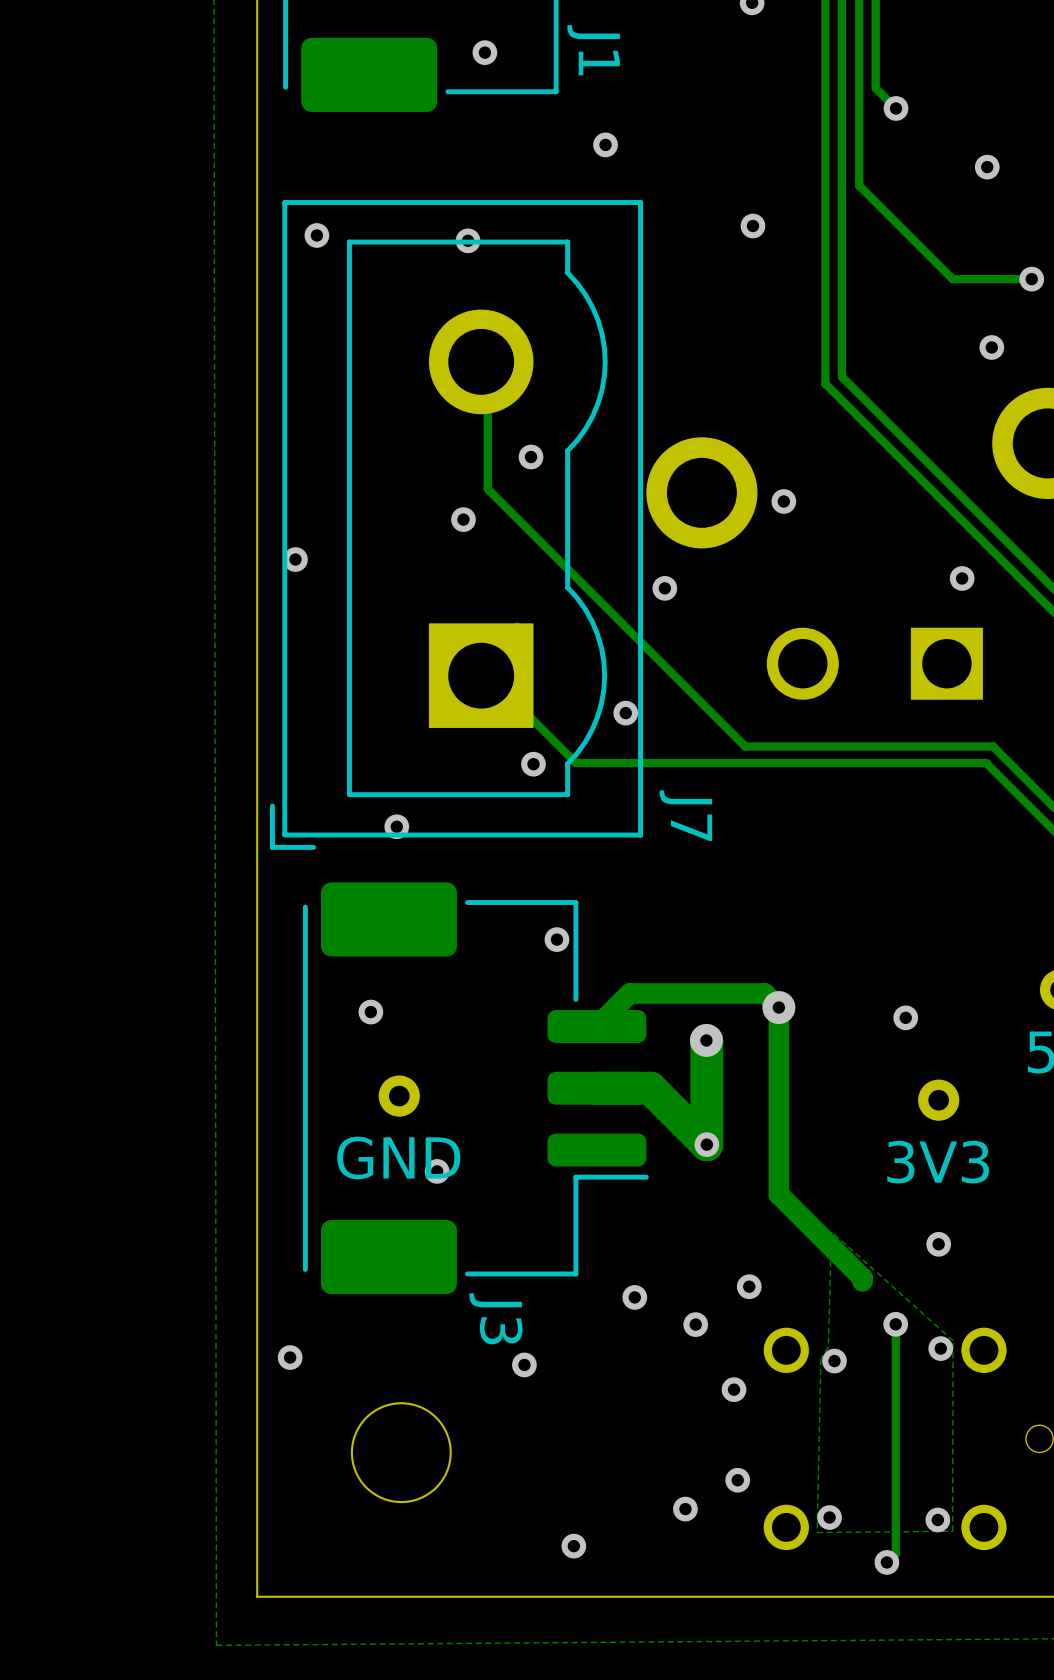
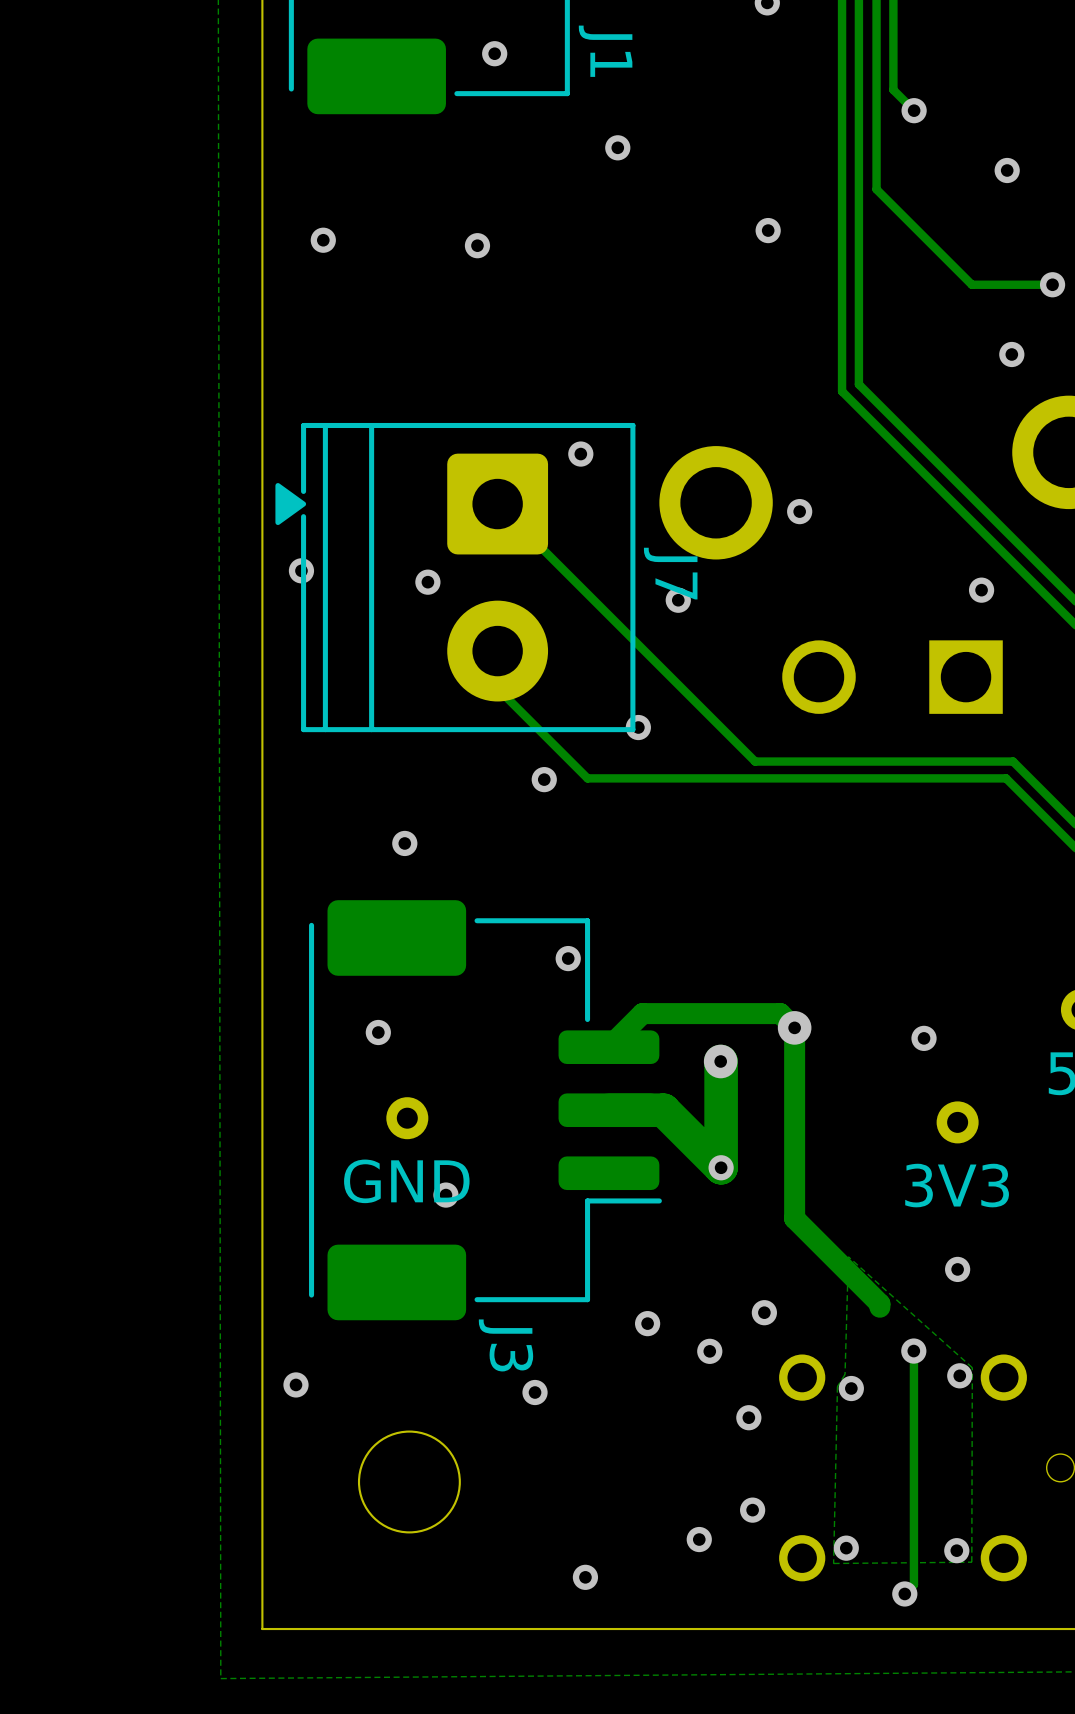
J7 footprint: [269, 200, 644, 850] -> [275, 422, 636, 733]
track: (487, 361) (487, 489) (745, 746) -> (497, 504) (755, 761) (760, 761)
via position: (531, 457) -> (580, 454)
via: (463, 519) -> none
via: none -> (427, 582)
J7 name position: J7 (685, 815) -> J7 (670, 573)

